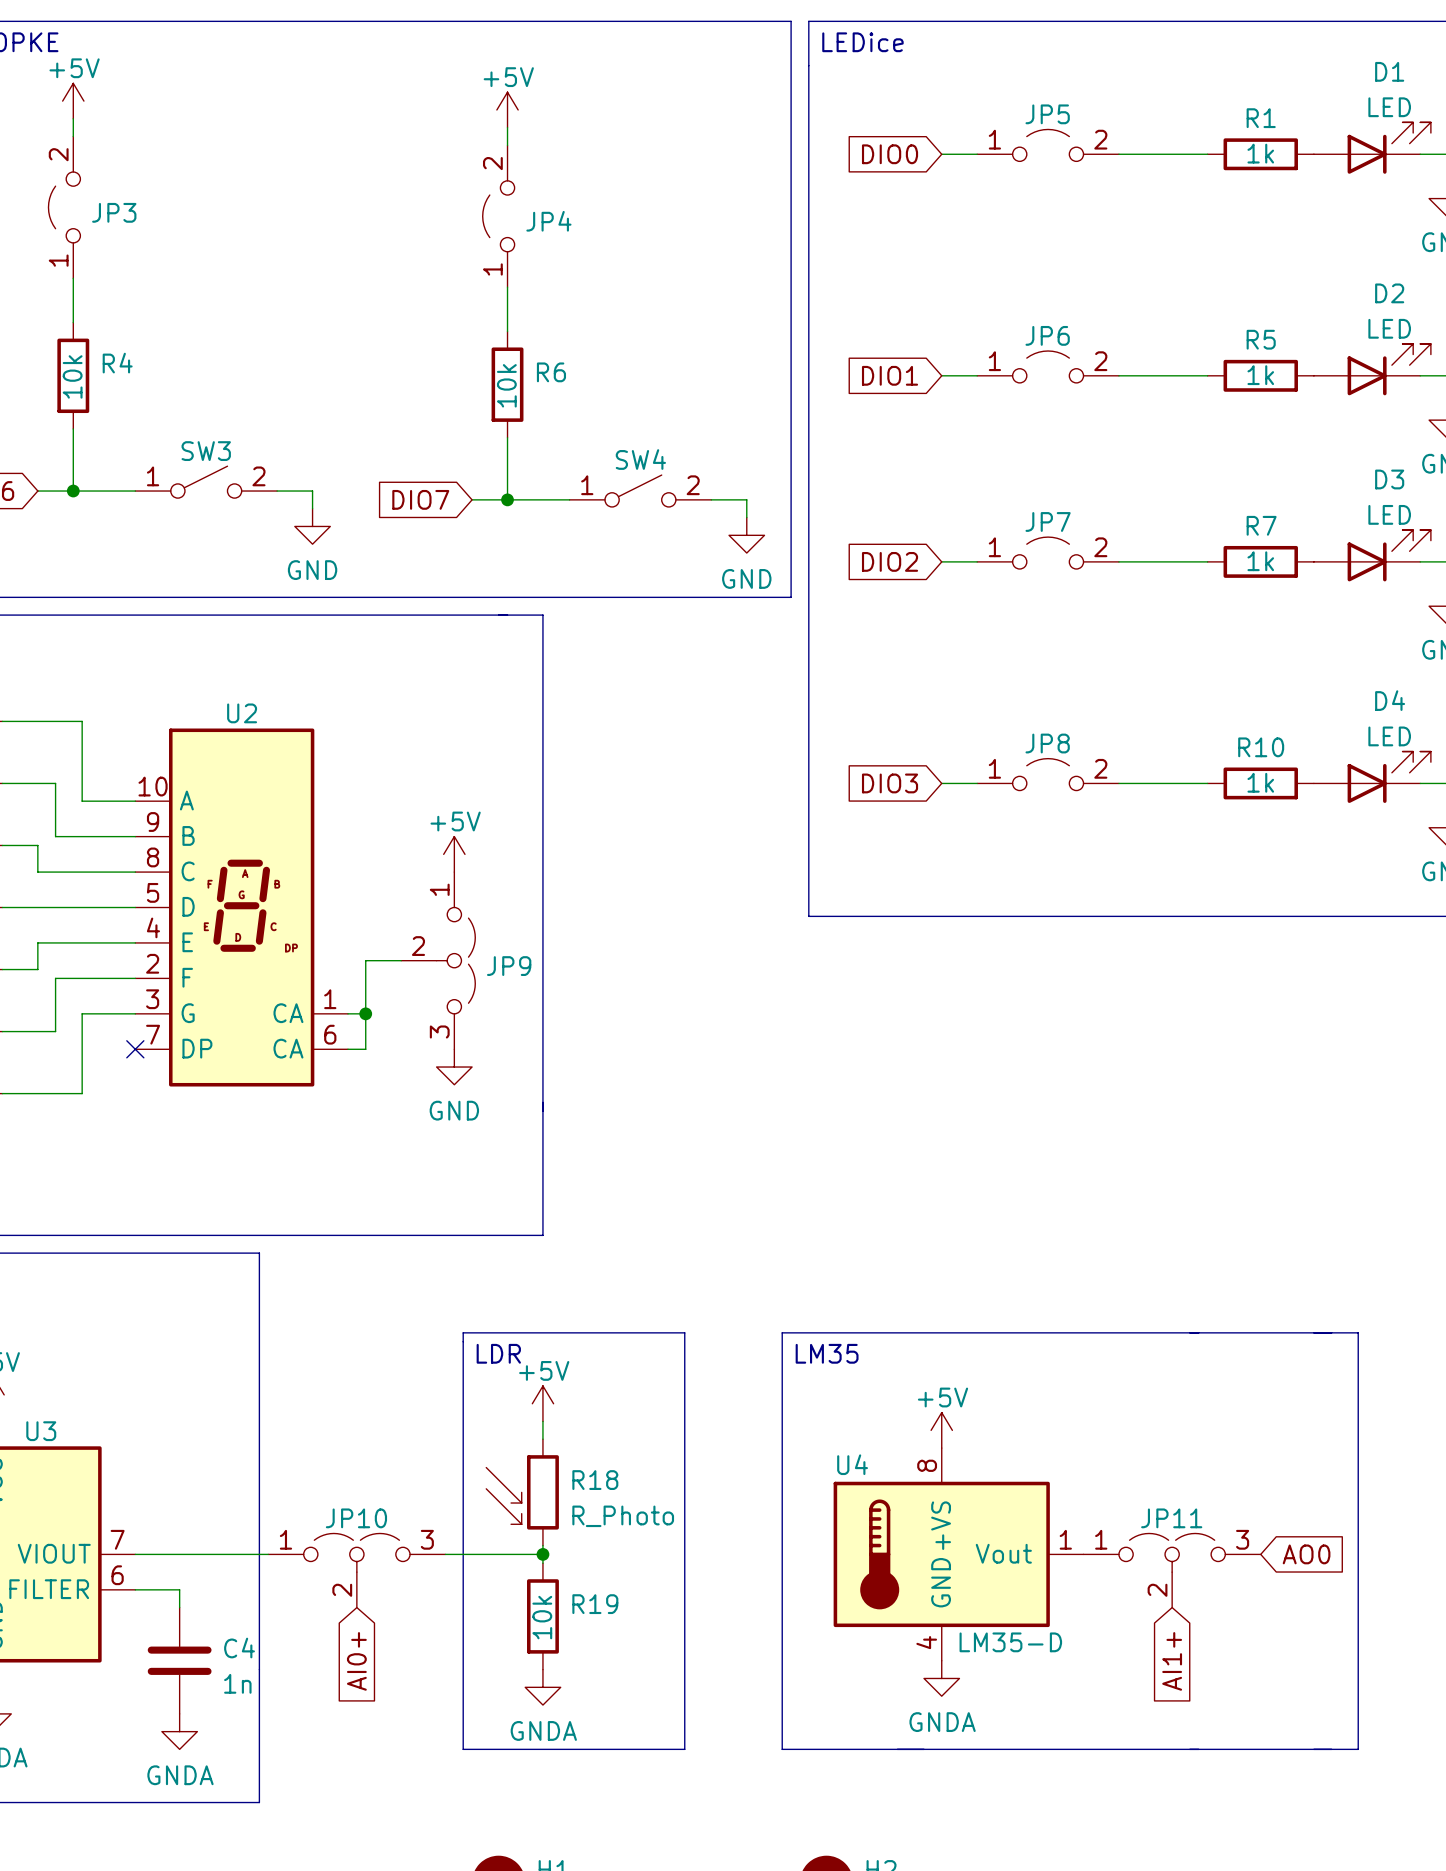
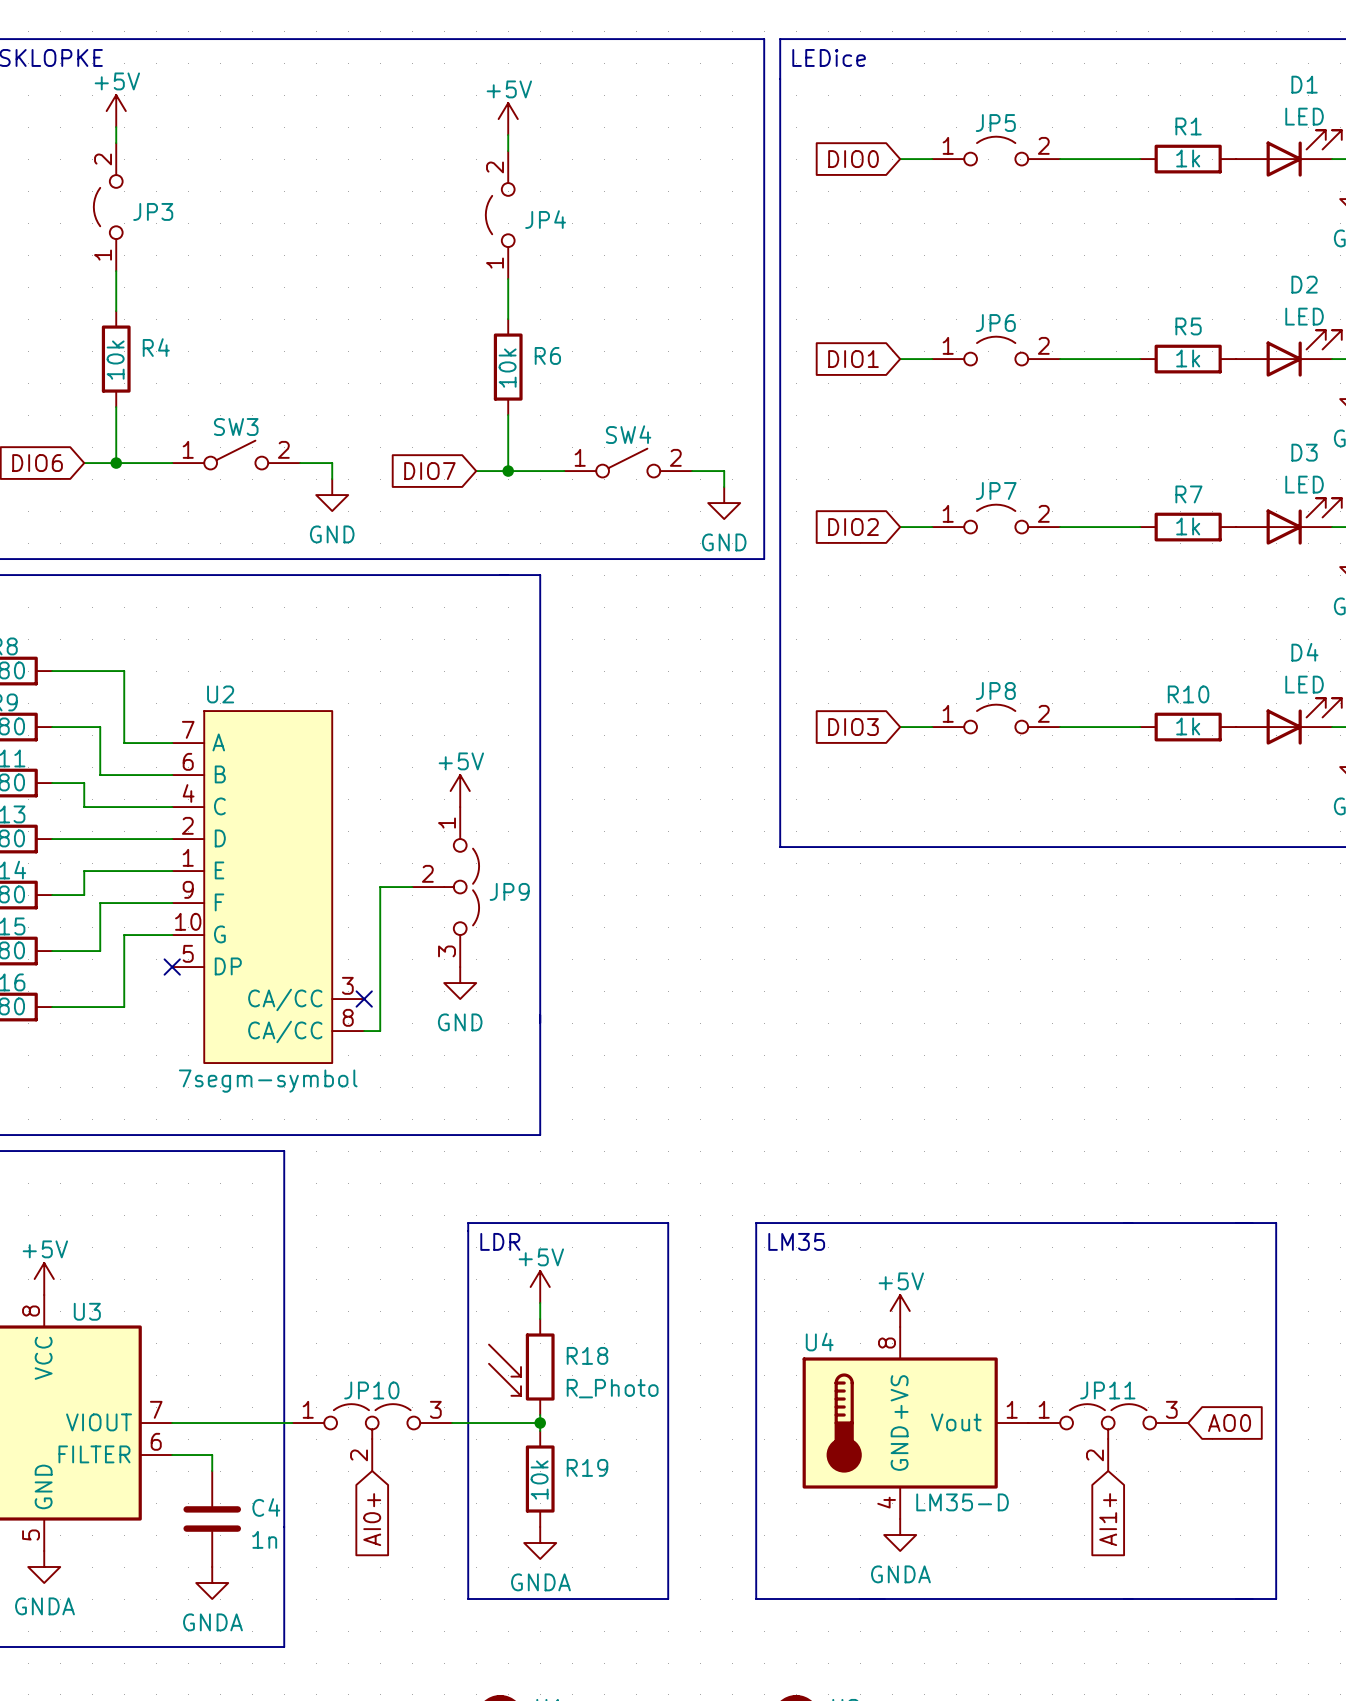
U2 name position: U2 (242, 713) -> U2 (220, 694)
U2 symbol: [135, 728, 349, 1087] -> [172, 711, 365, 1064]
wire: (348, 1013) (365, 1013) -> none
junction: (365, 1013) -> none
wire: (348, 1049) (365, 1049) -> (364, 1031) (380, 1031) (380, 967)
no-connect mark: none -> (364, 999)
U2 value: none -> 7segm-symbol (268, 1081)

